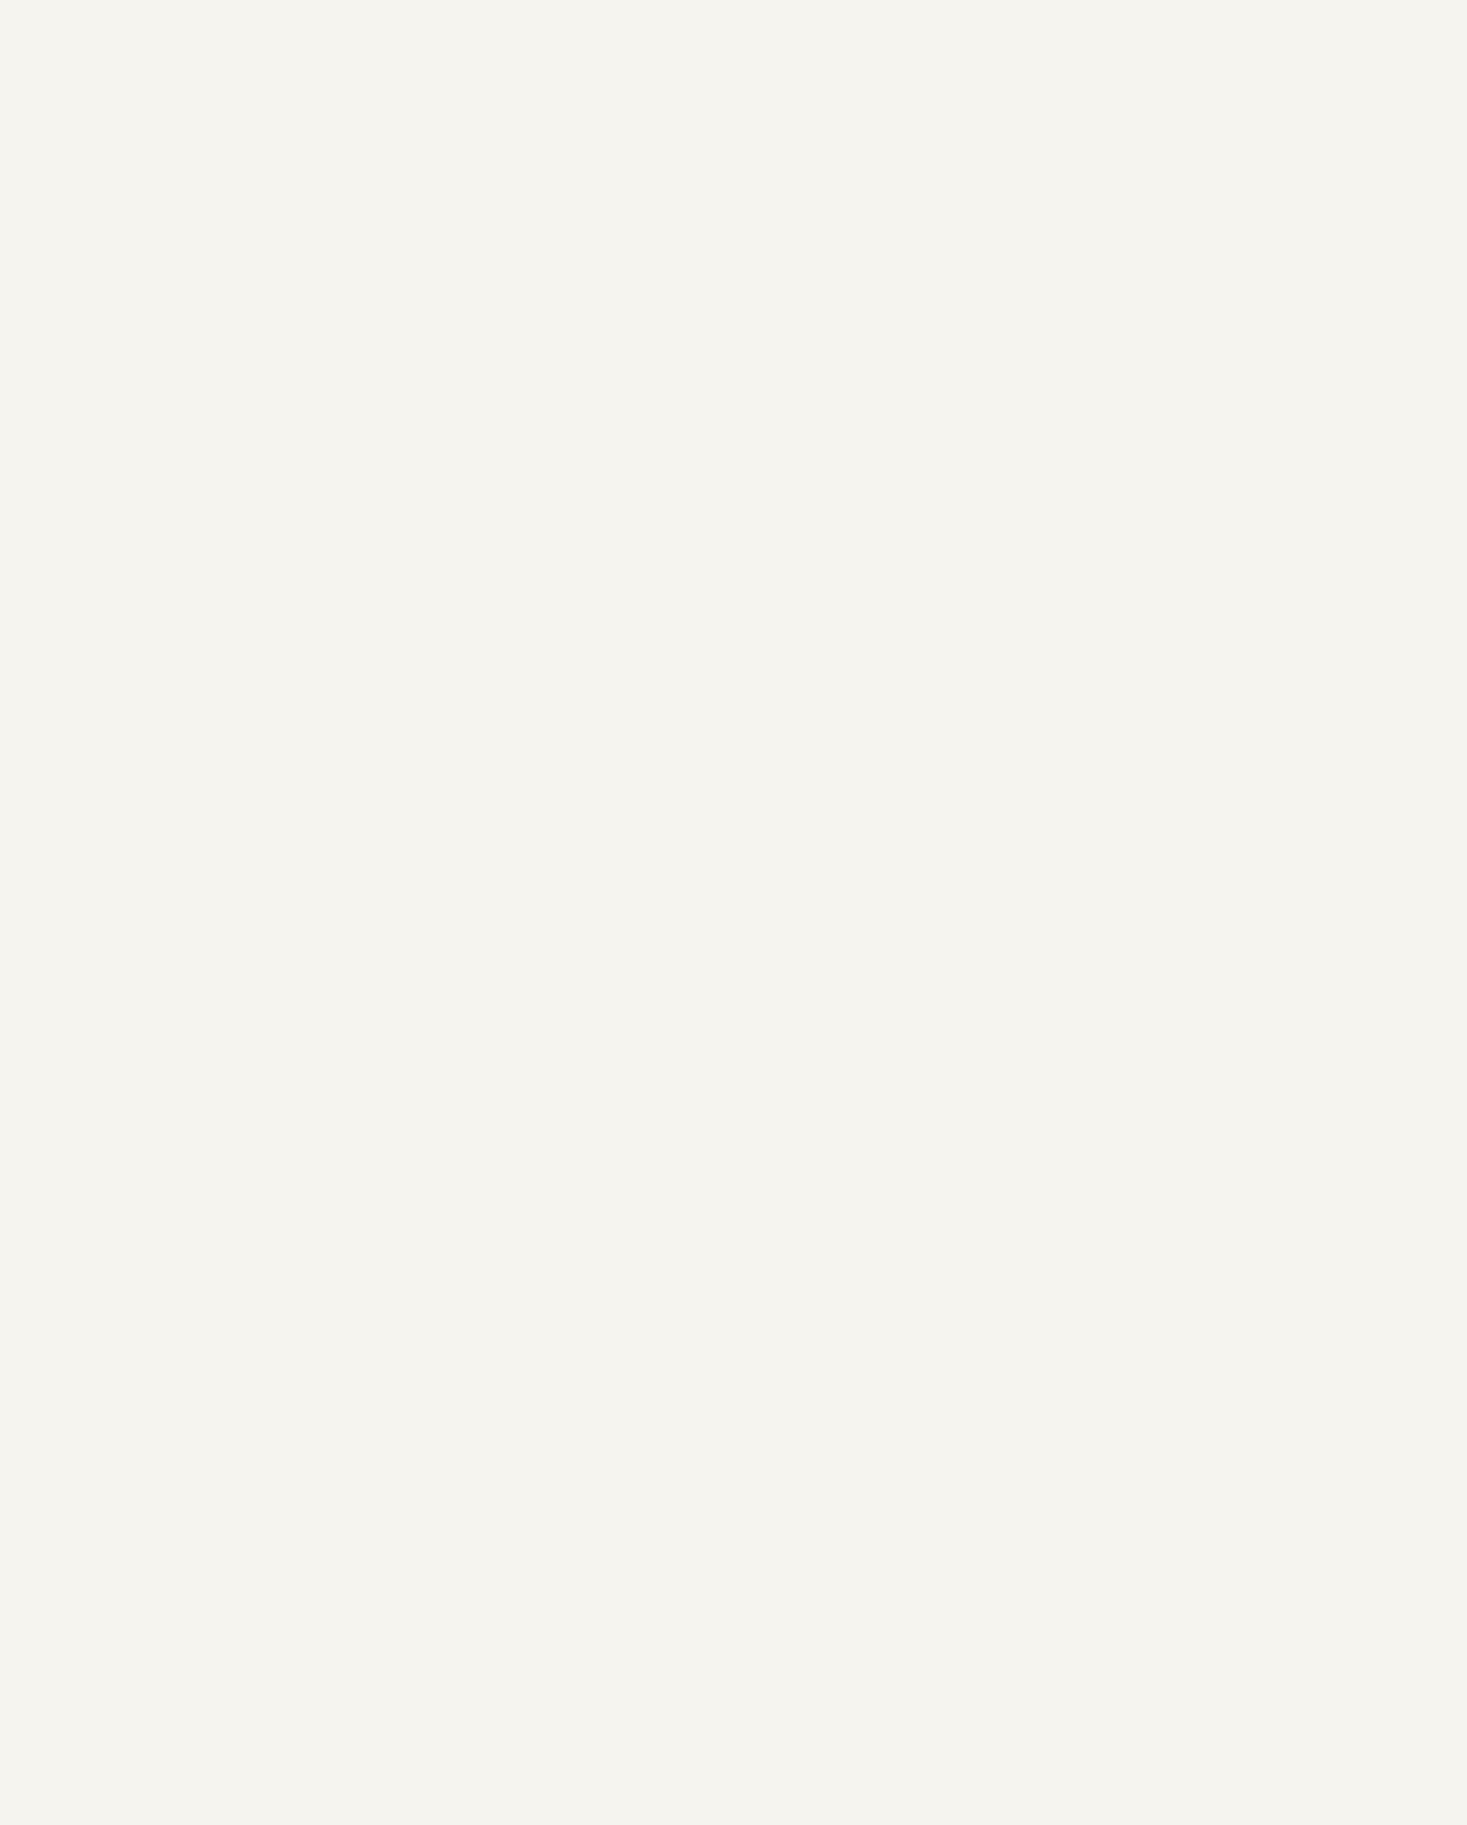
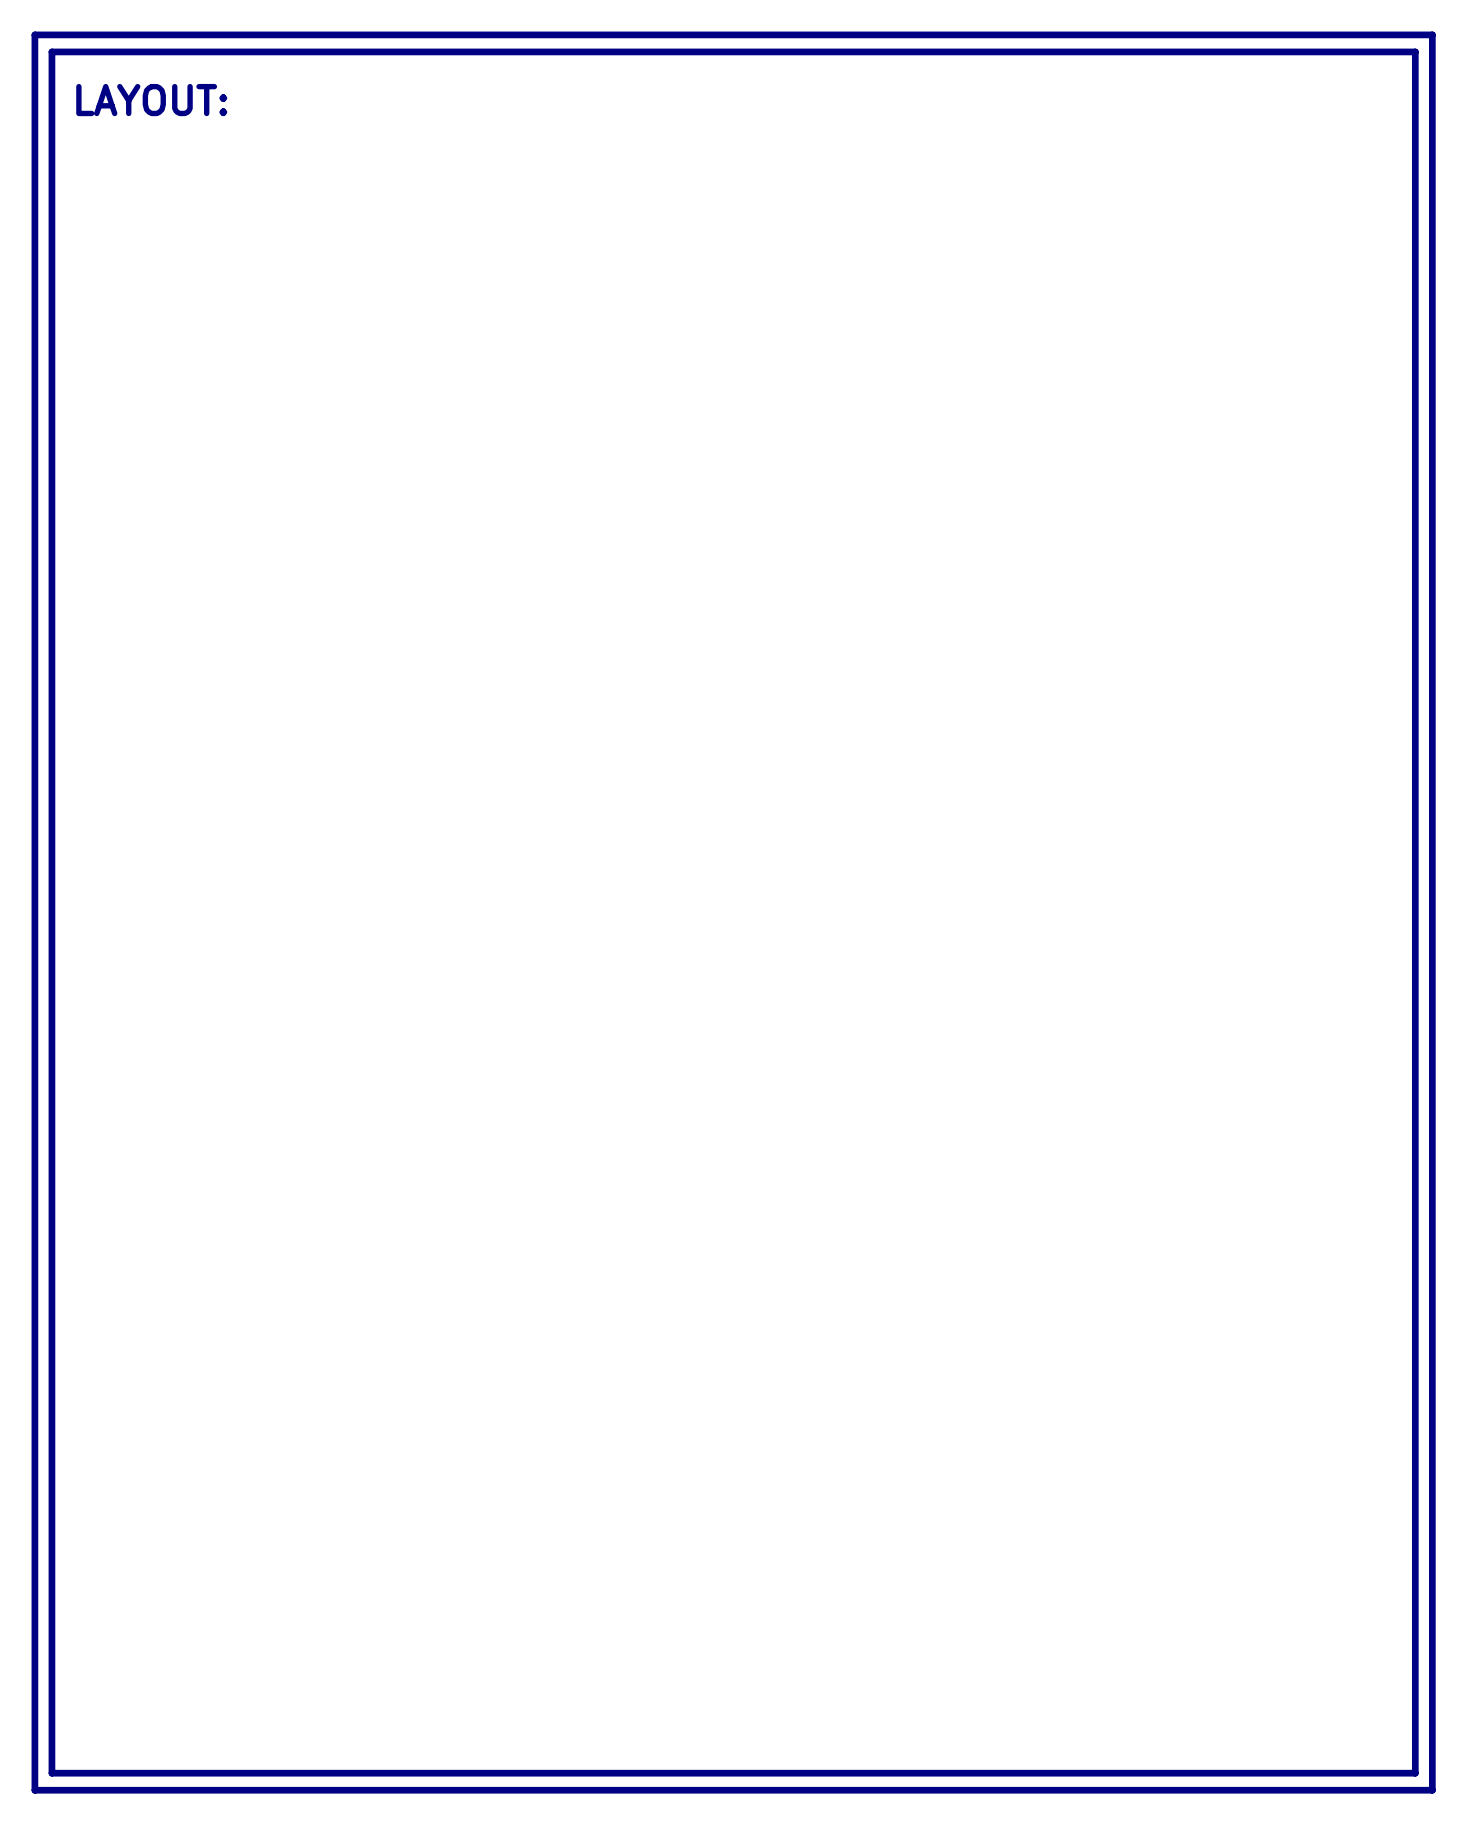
line: none -> (34, 34) (34, 1790) (1432, 1790) (1432, 34) (34, 34)
line: none -> (51, 51) (51, 1773) (1415, 1773) (1415, 51) (51, 51)
text: none -> LAYOUT: (151, 100)

